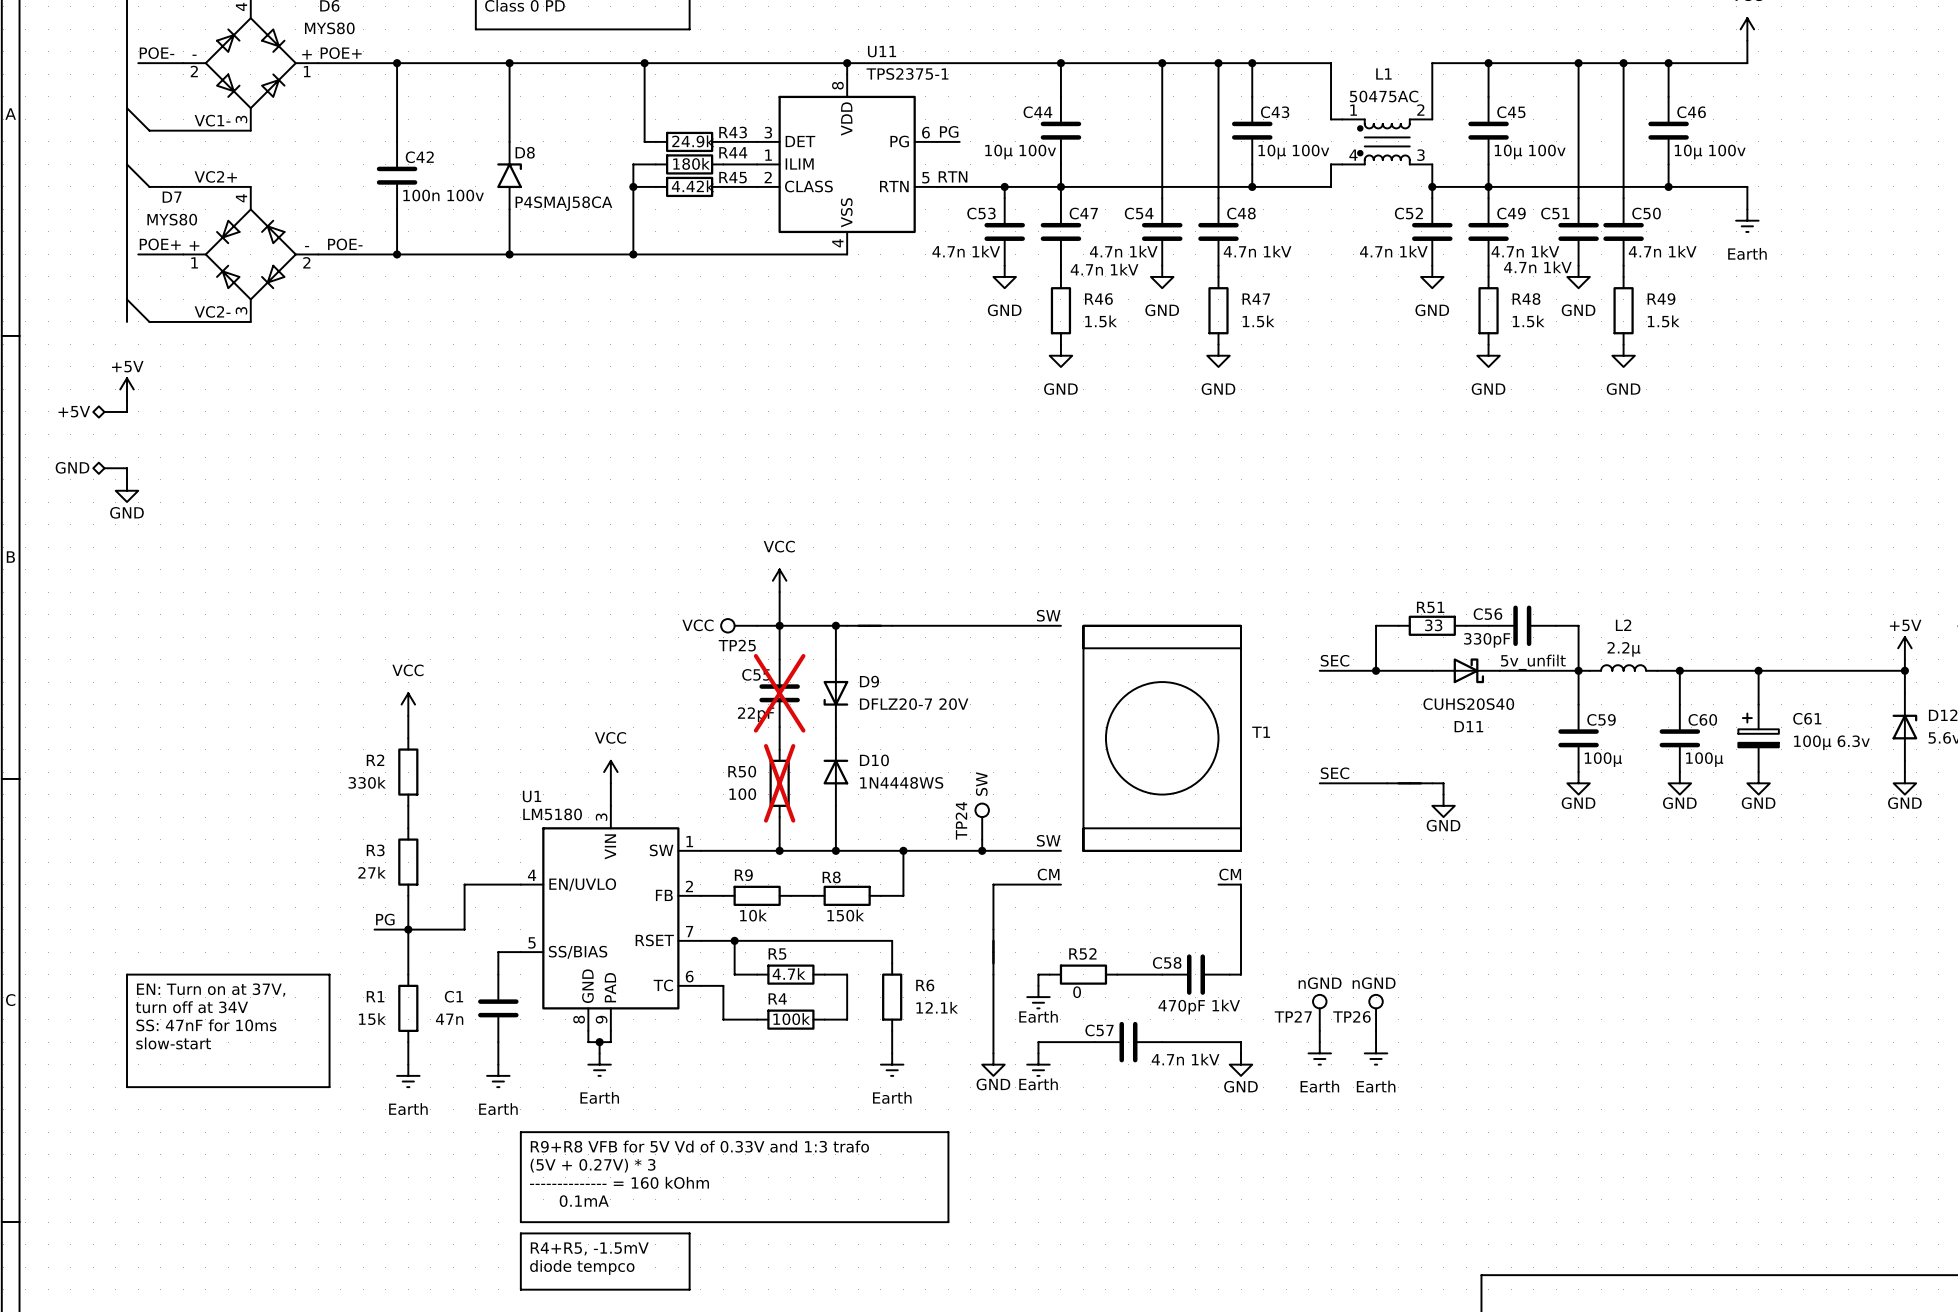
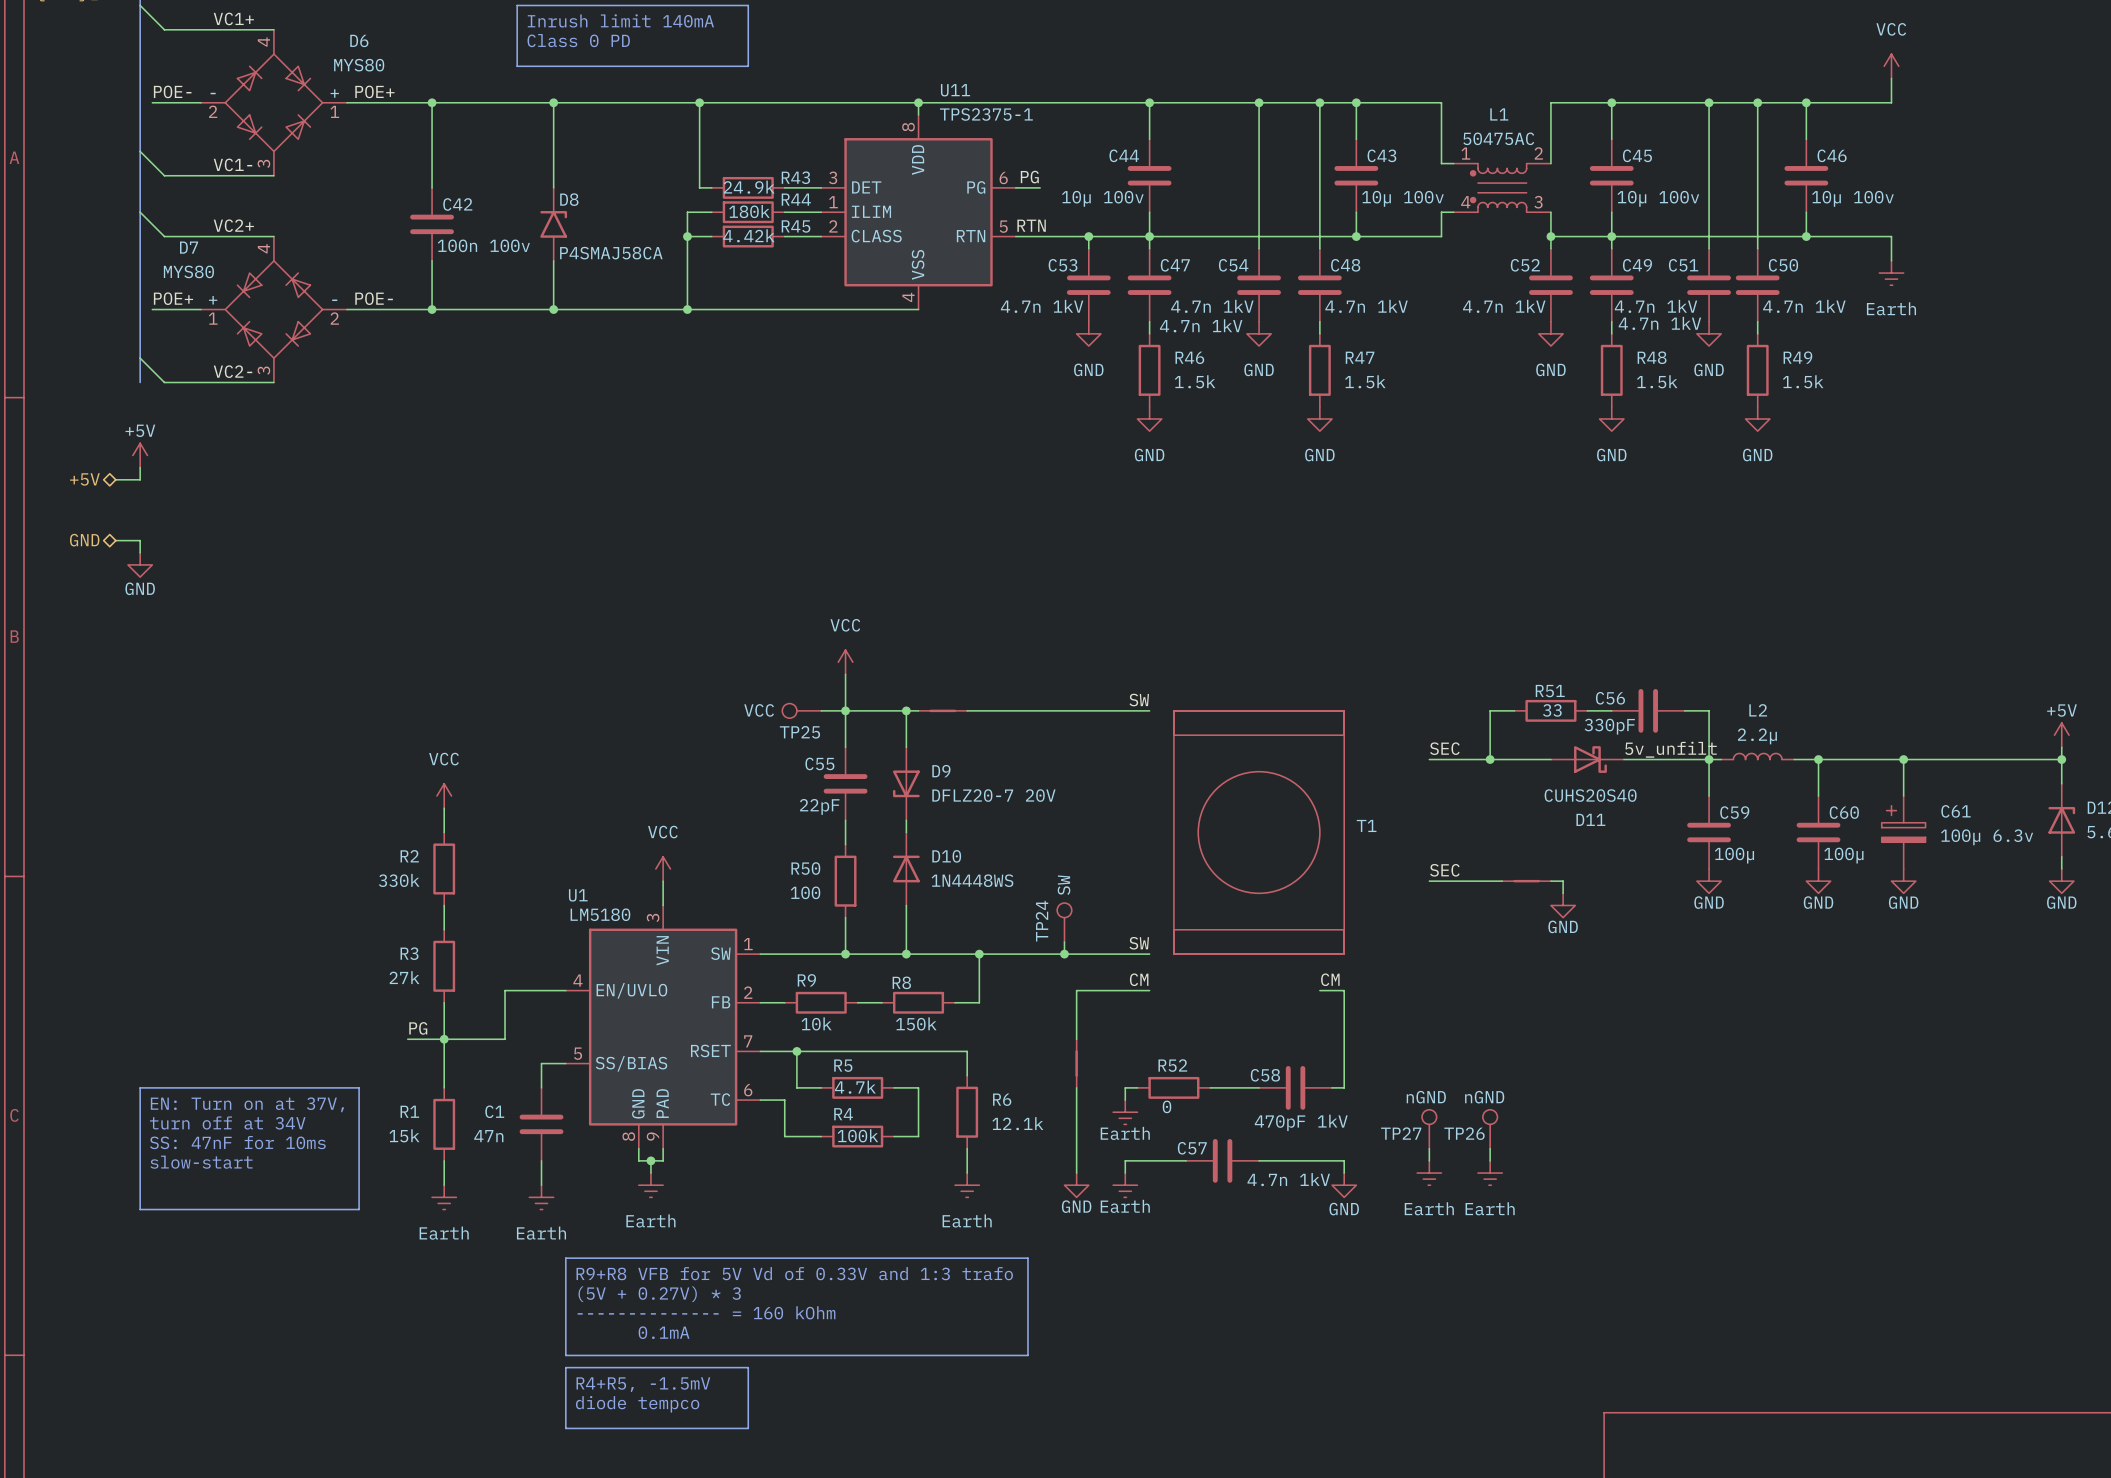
C55 do-not-place cross: (779, 693) -> none
R50 do-not-place cross: (779, 783) -> none

